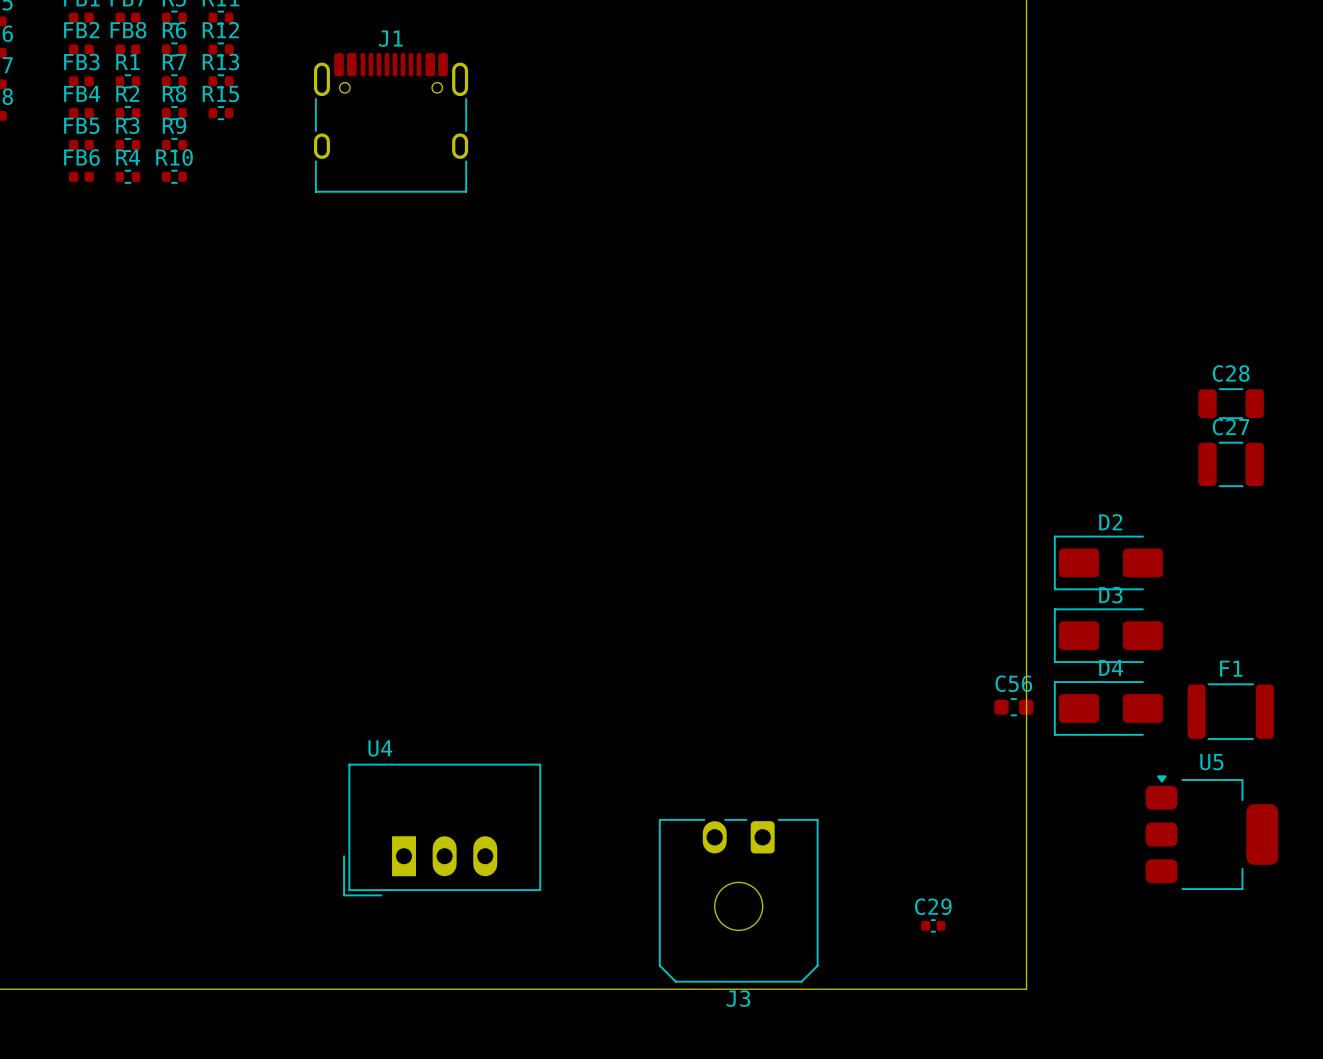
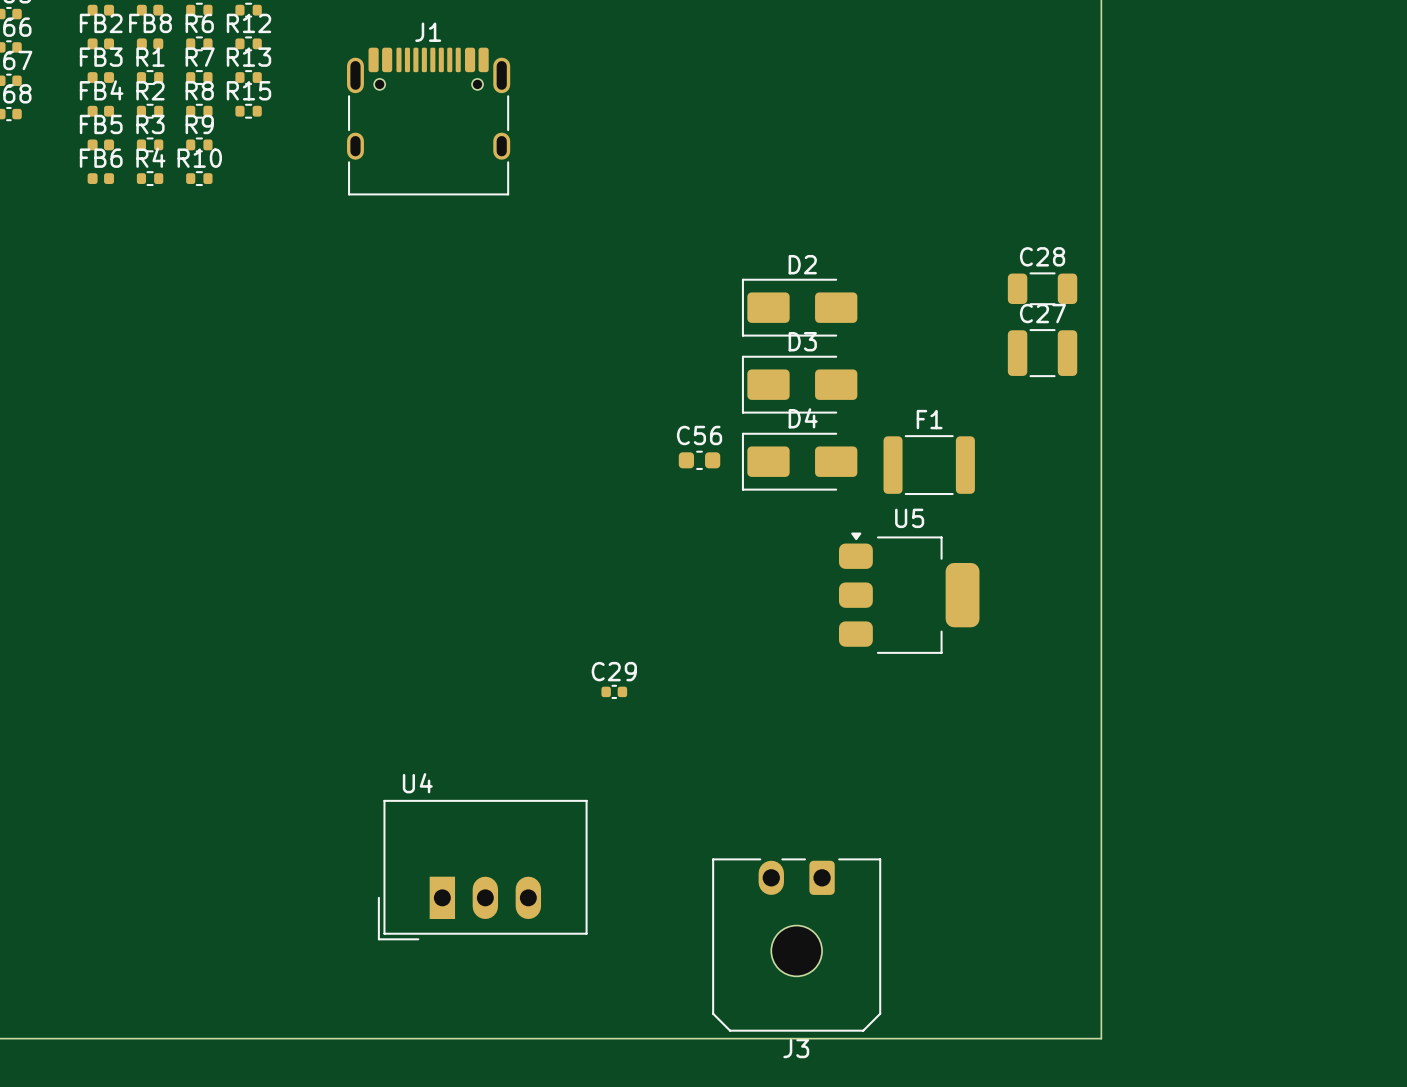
C28 position: (1231, 403) -> (1042, 288)
C27 position: (1231, 464) -> (1042, 353)
D2 position: (1108, 562) -> (799, 307)
D3 position: (1108, 635) -> (799, 384)
C56 position: (1013, 707) -> (699, 460)
D4 position: (1108, 708) -> (799, 461)
F1 position: (1230, 711) -> (929, 465)
U5 position: (1211, 832) -> (909, 593)
C29 position: (933, 925) -> (614, 691)

